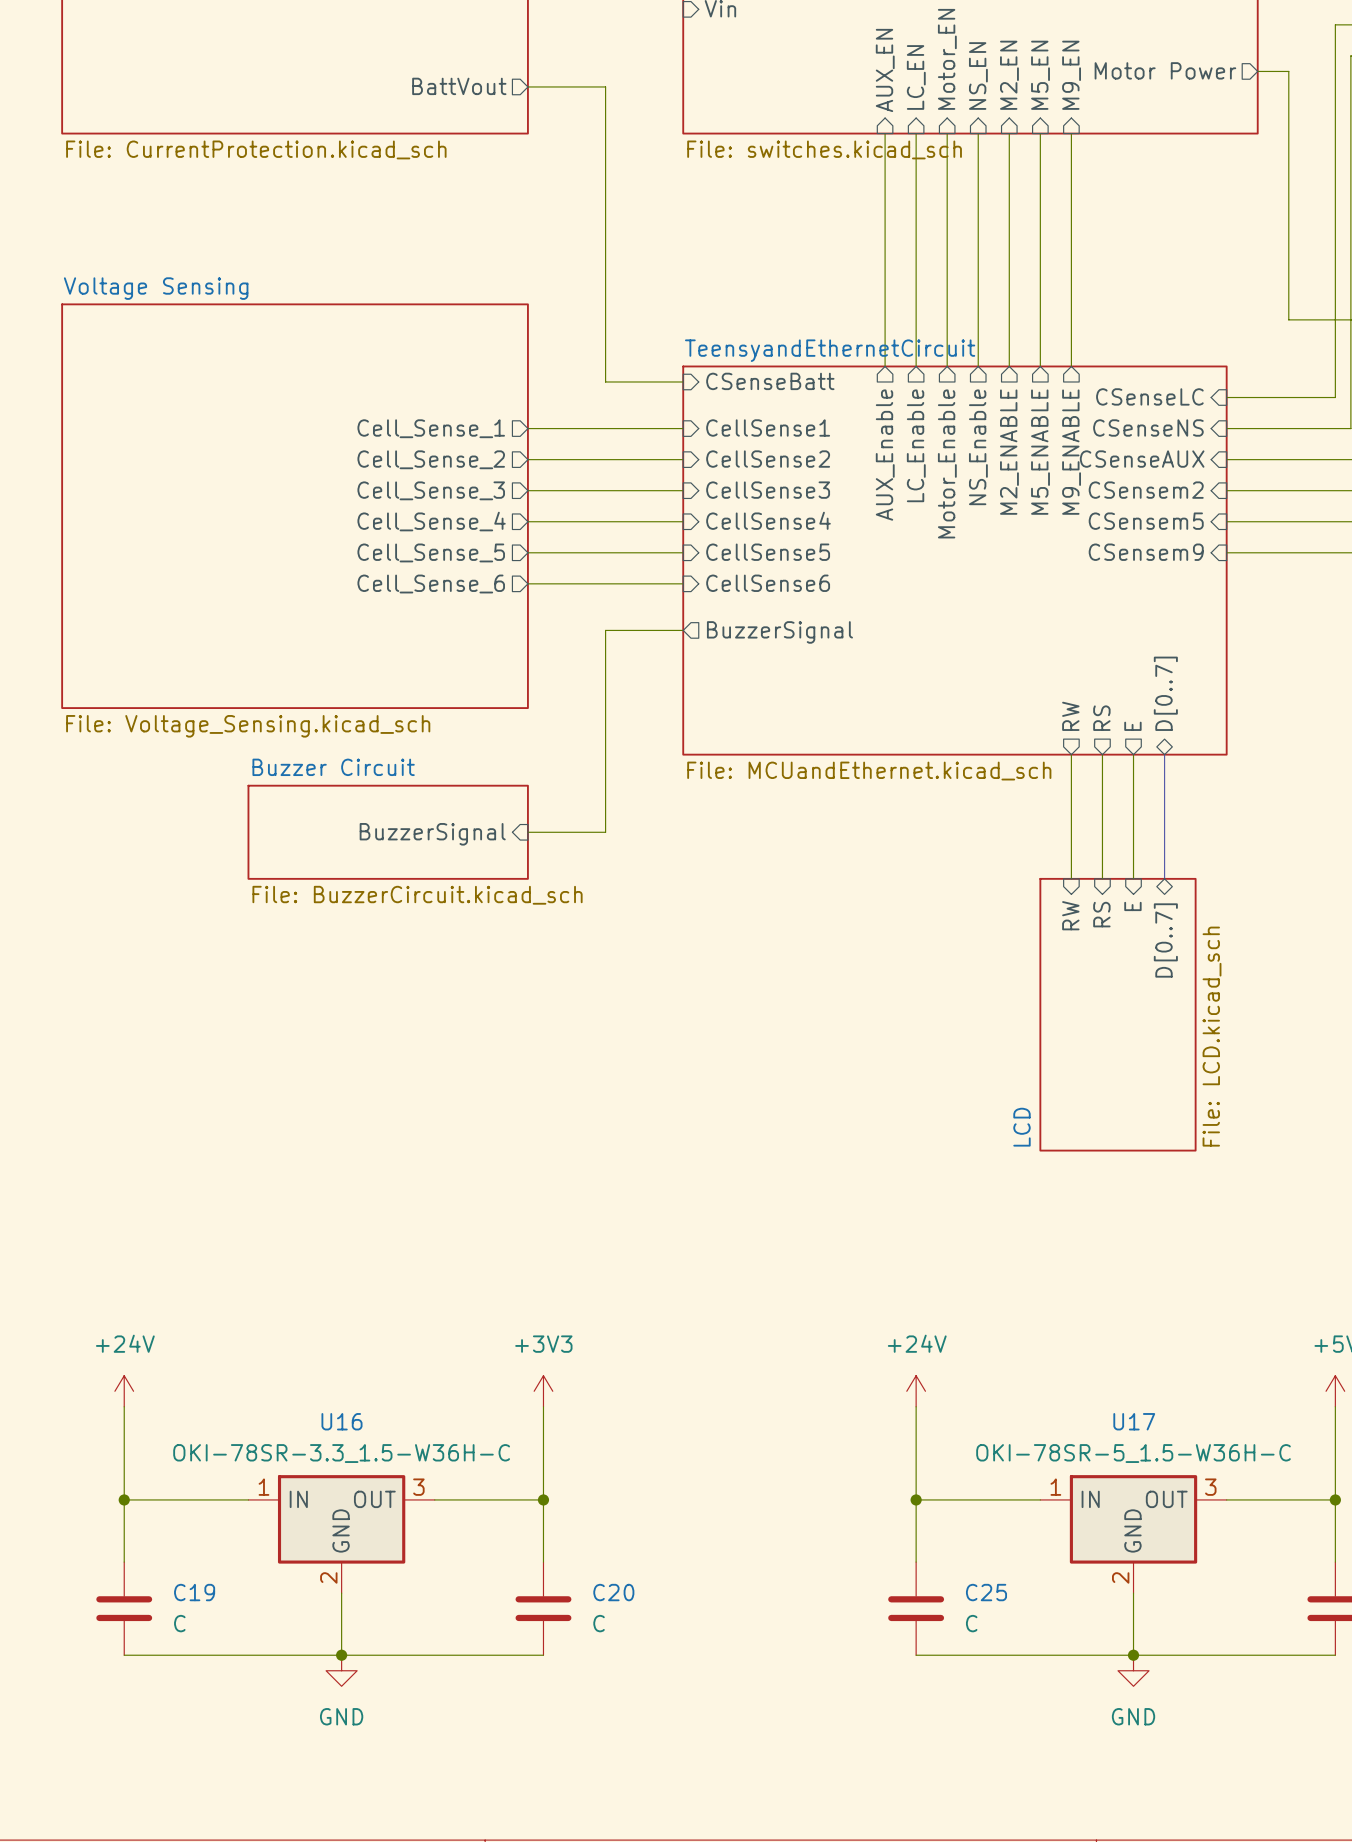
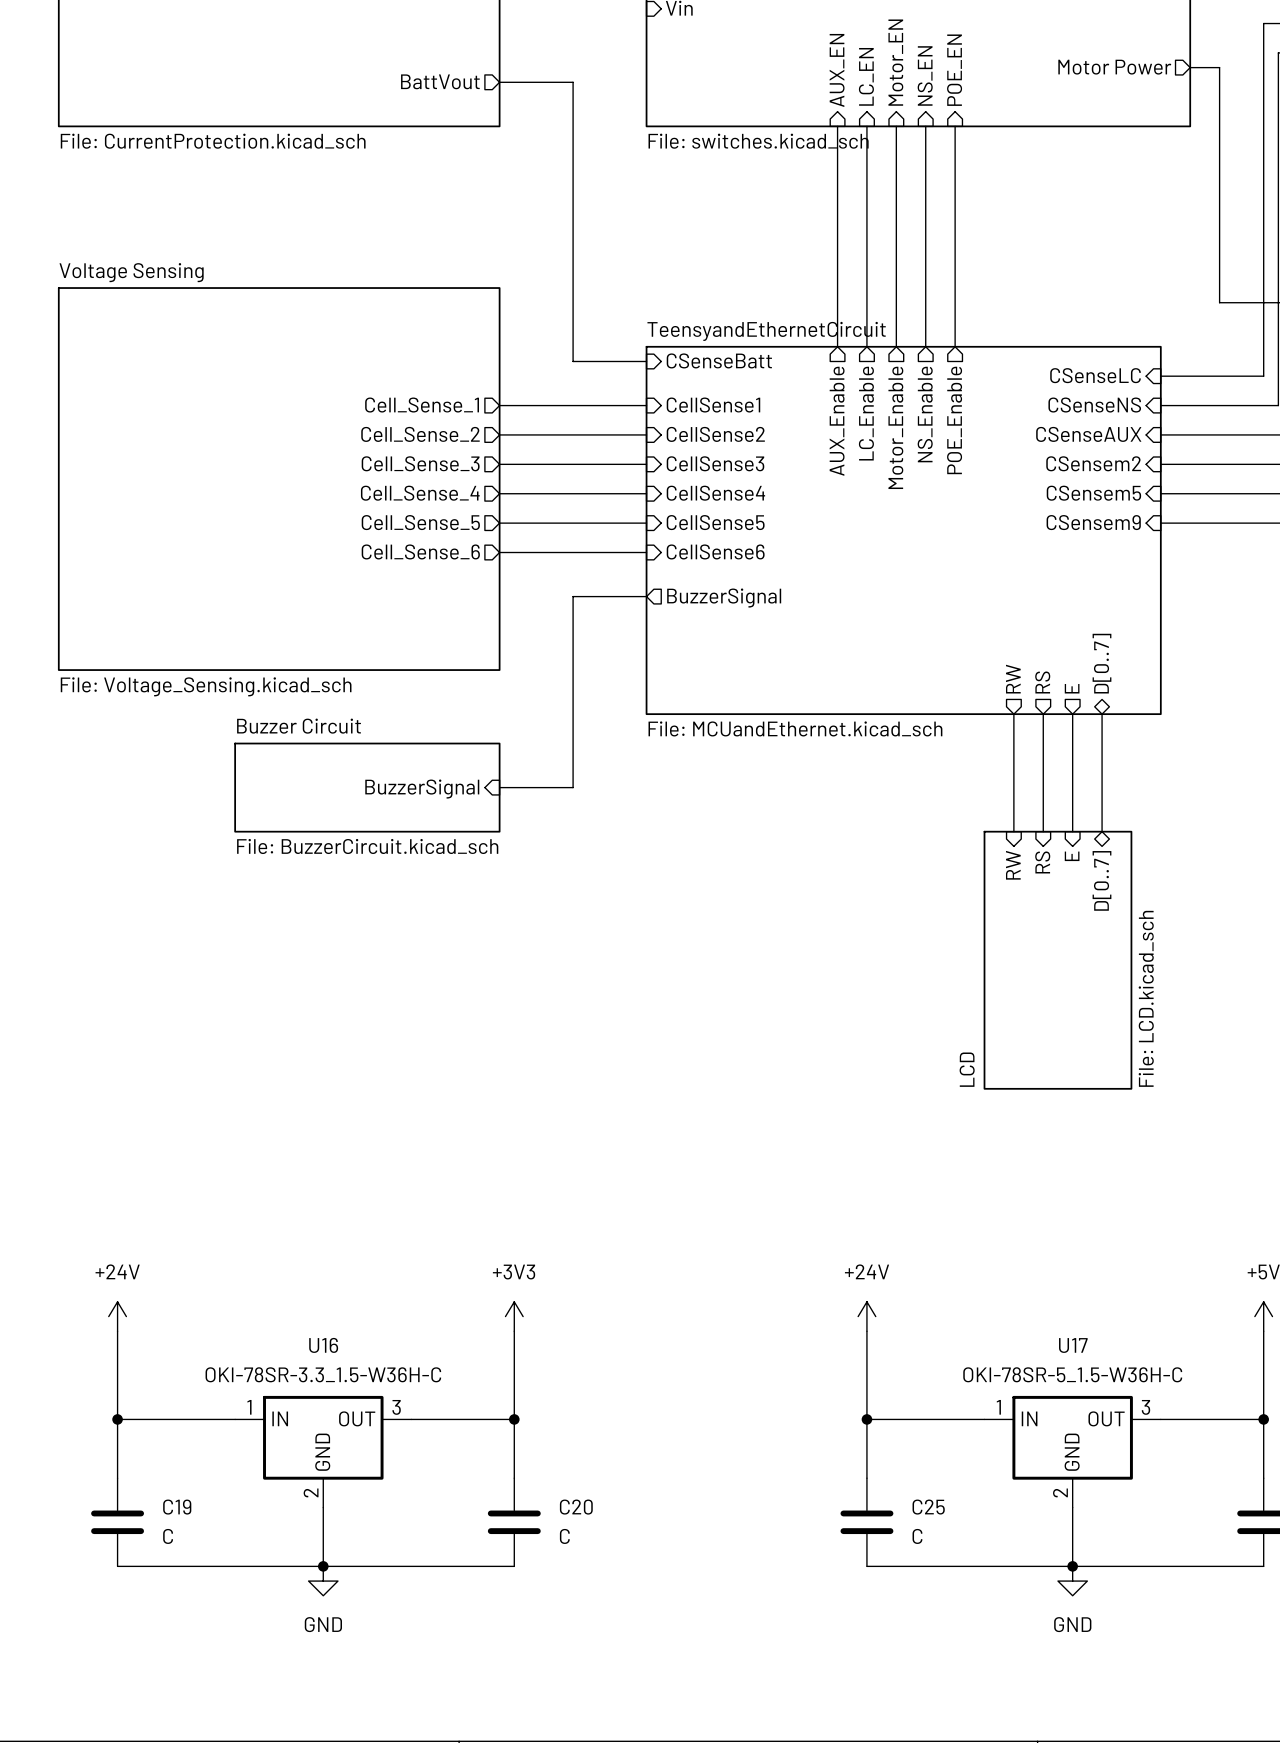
sheet pin: M2_EN (1009, 75) -> POE_EN (954, 70)
sheet pin: M5_EN (1040, 75) -> none
sheet pin: M9_EN (1071, 75) -> none
wire: (1040, 133) (1040, 366) -> none
wire: (1071, 133) (1071, 366) -> none
sheet pin: M2_ENABLE (1009, 452) -> POE_Enable (954, 420)
sheet pin: M5_ENABLE (1040, 452) -> none
sheet pin: M9_ENABLE (1071, 452) -> none

